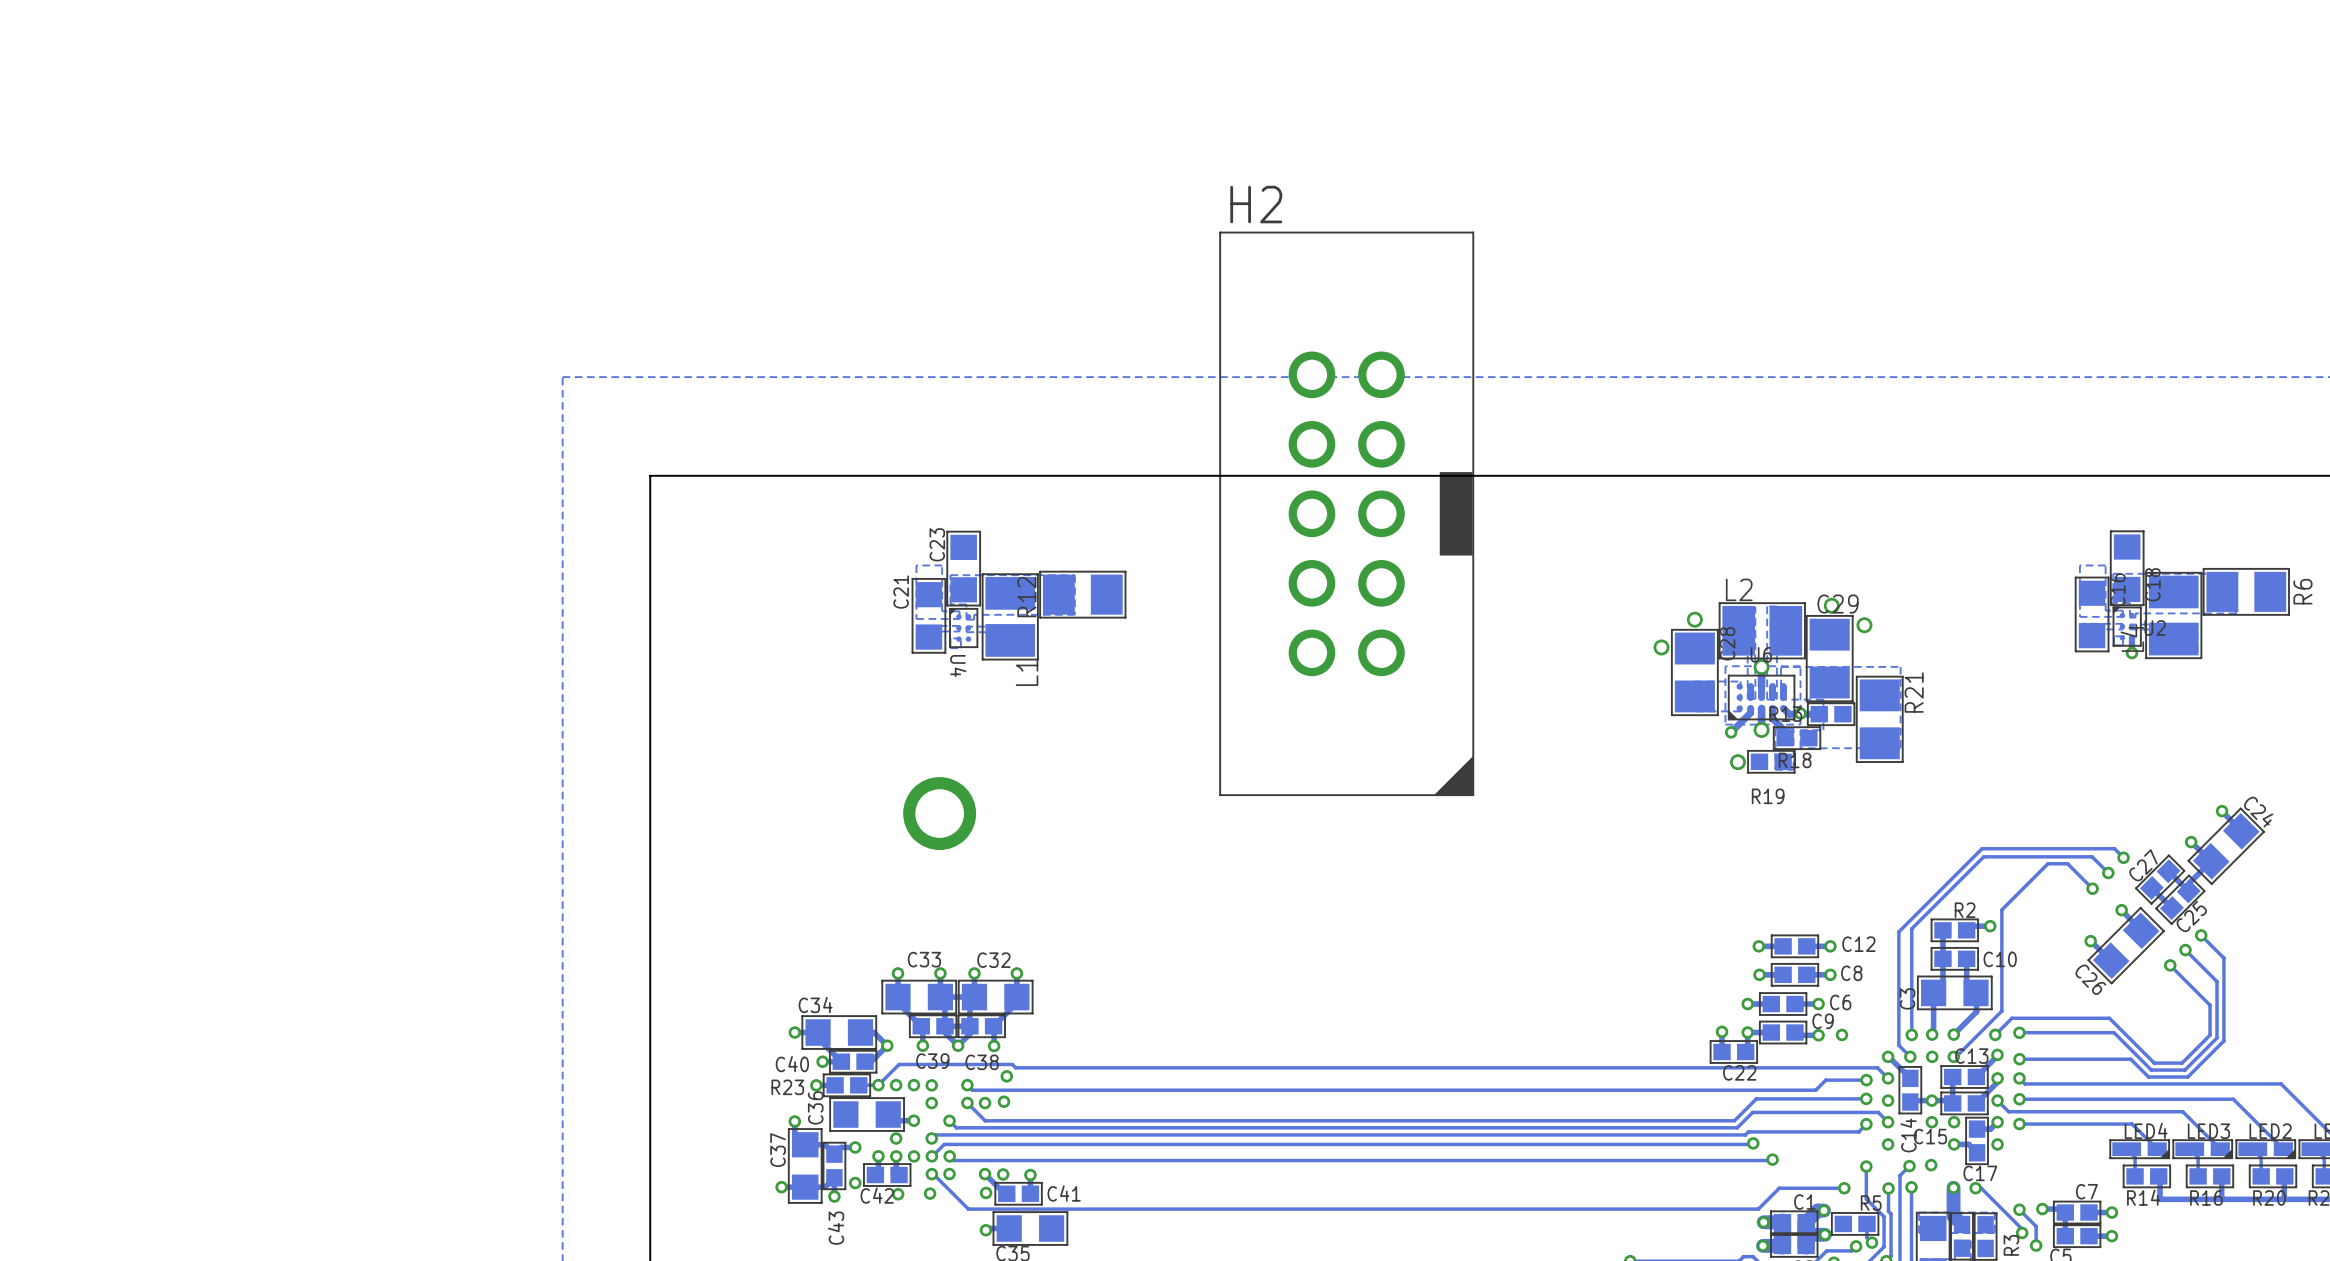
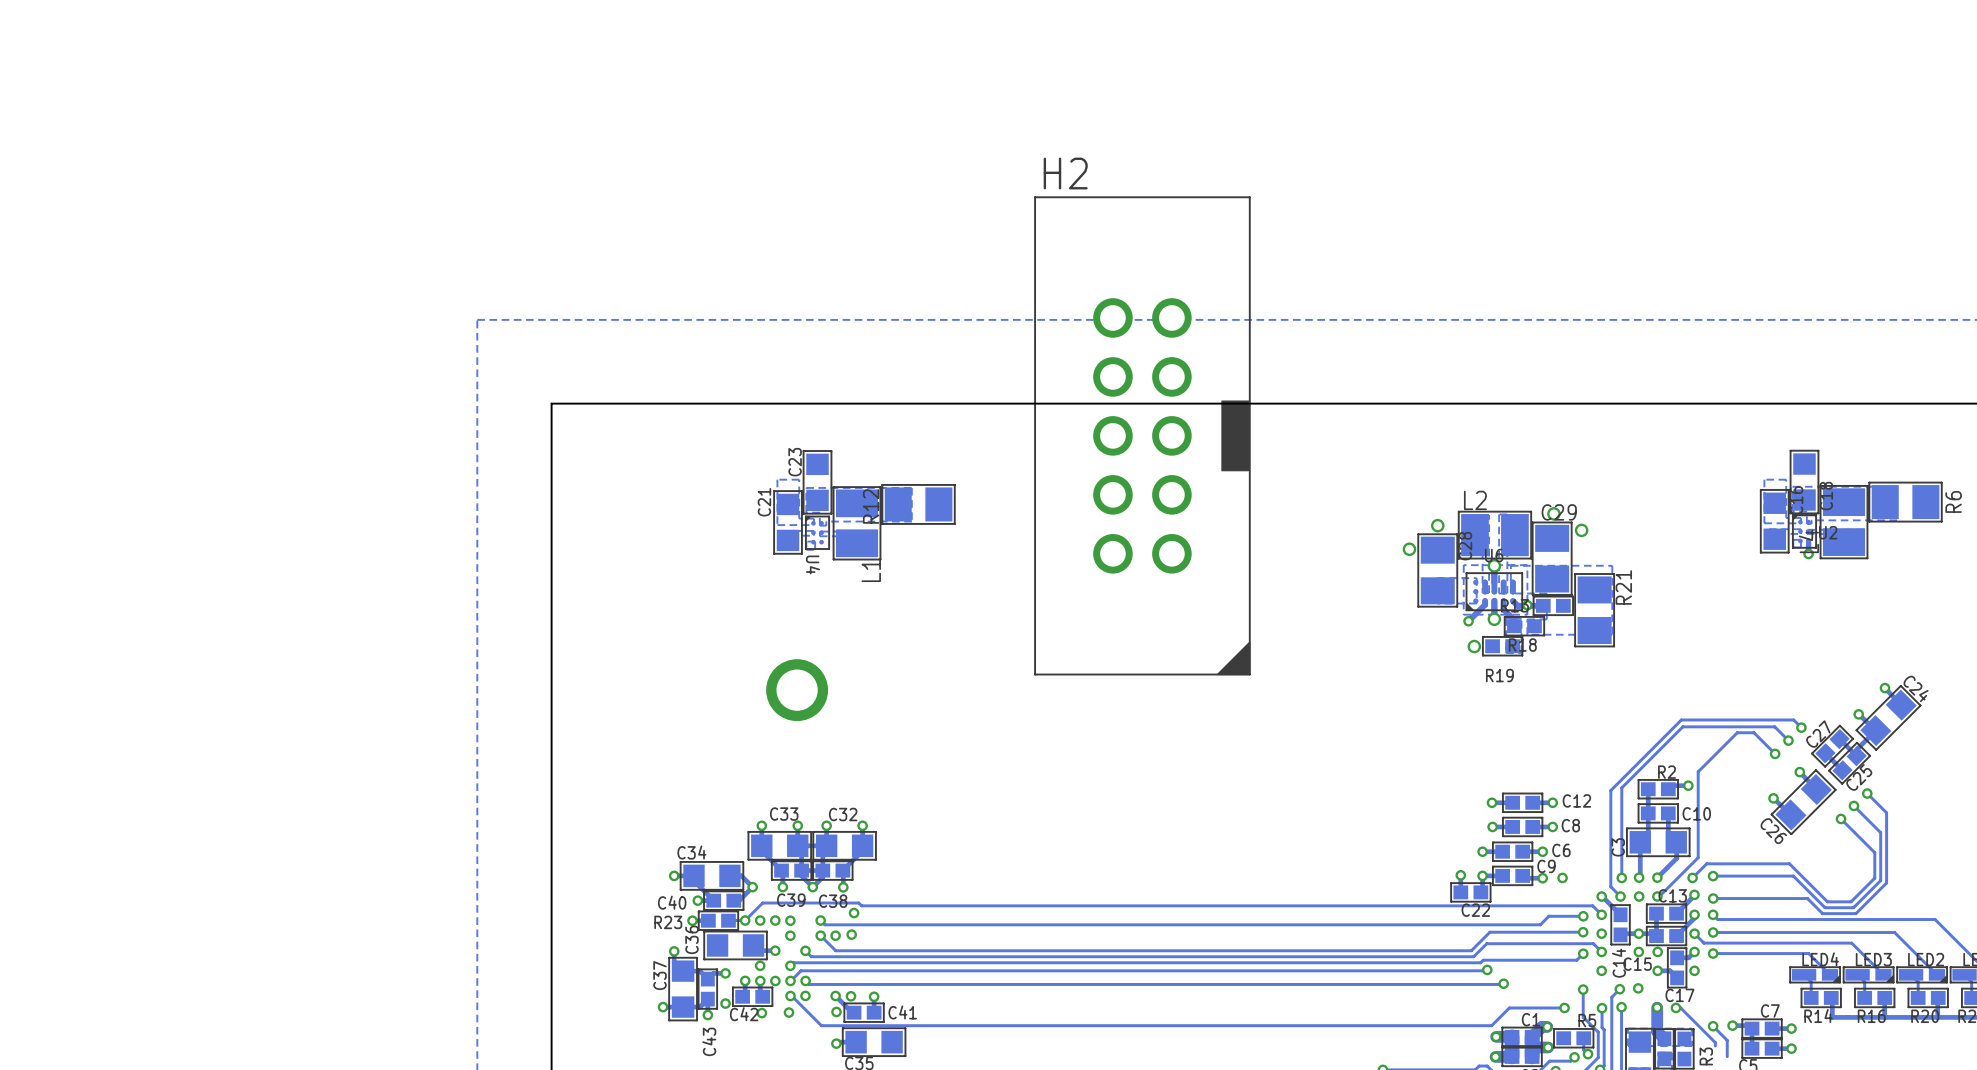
via: (2022, 1233) -> none
via: (2036, 1245) -> none

